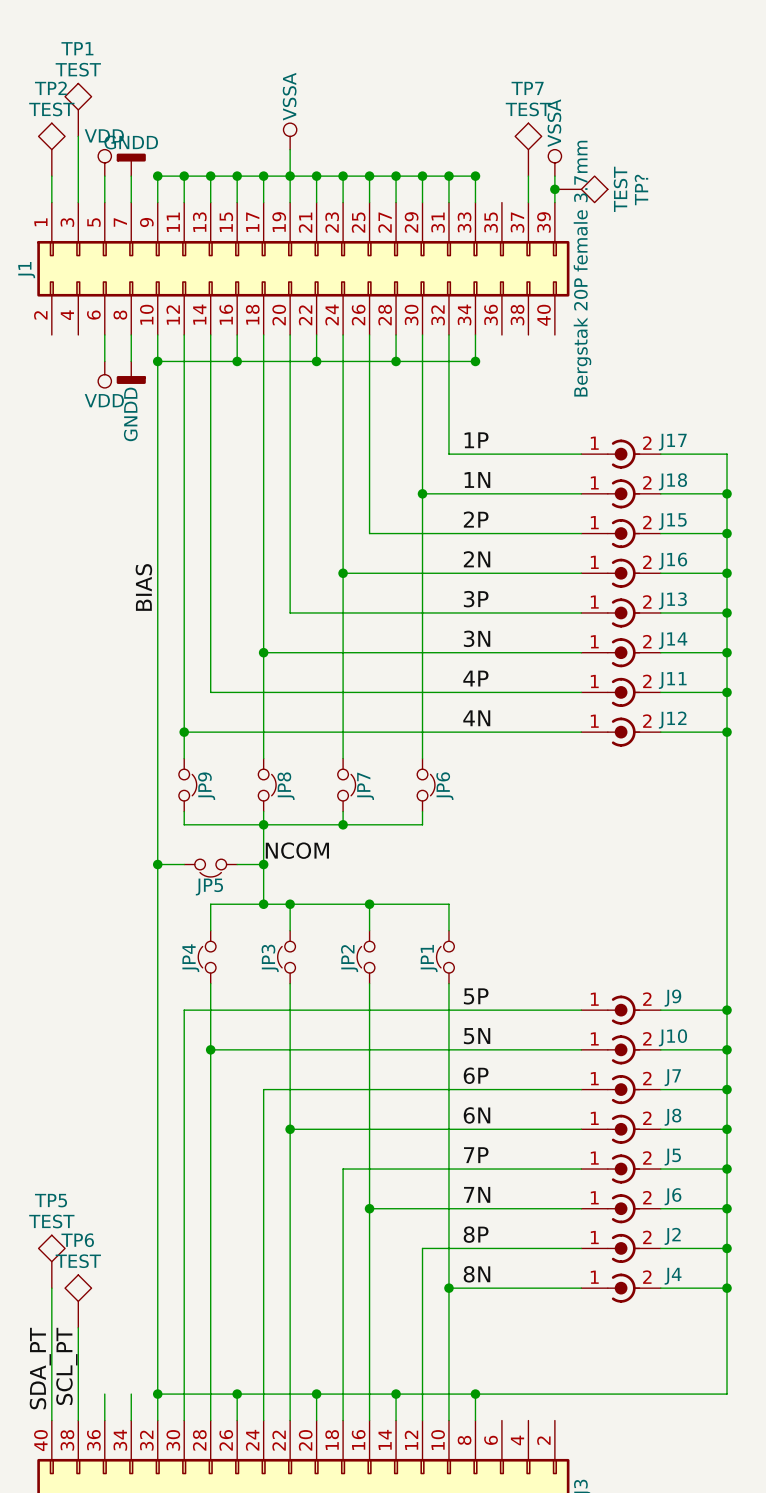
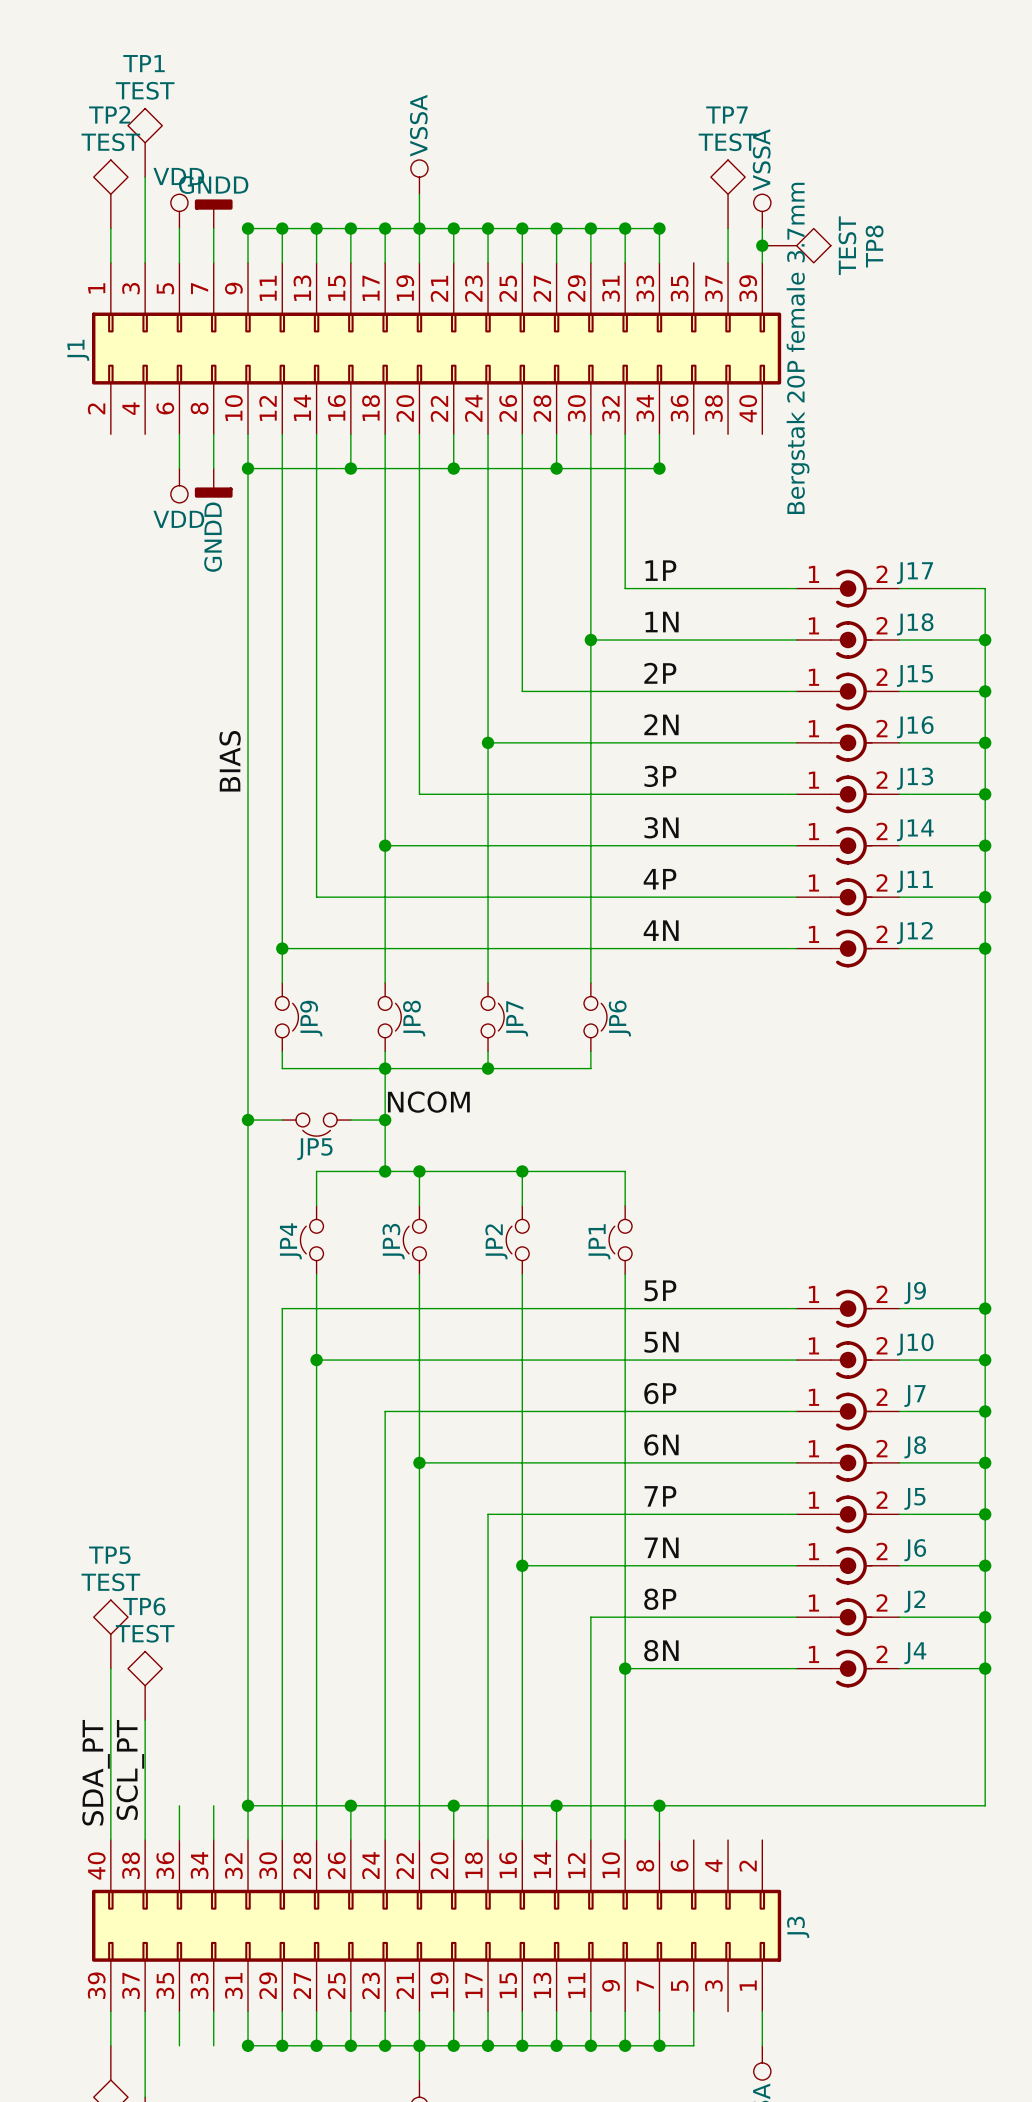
TP? name: TP? (641, 190) -> TP8 (874, 246)

